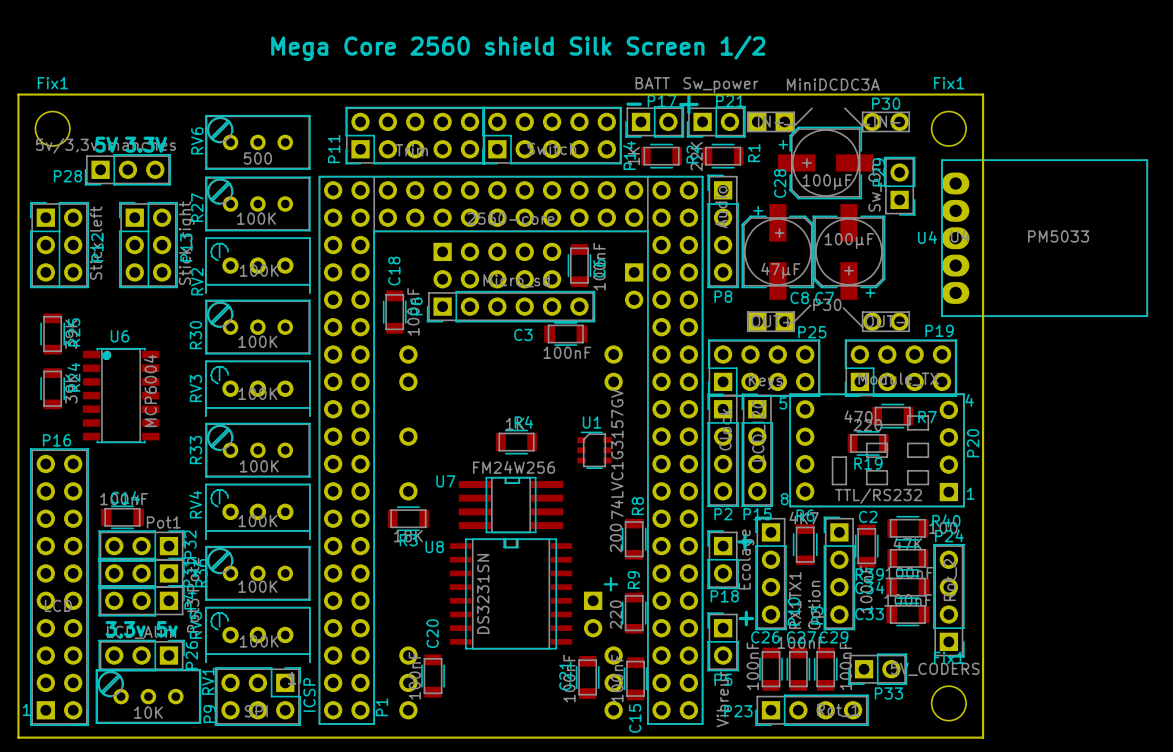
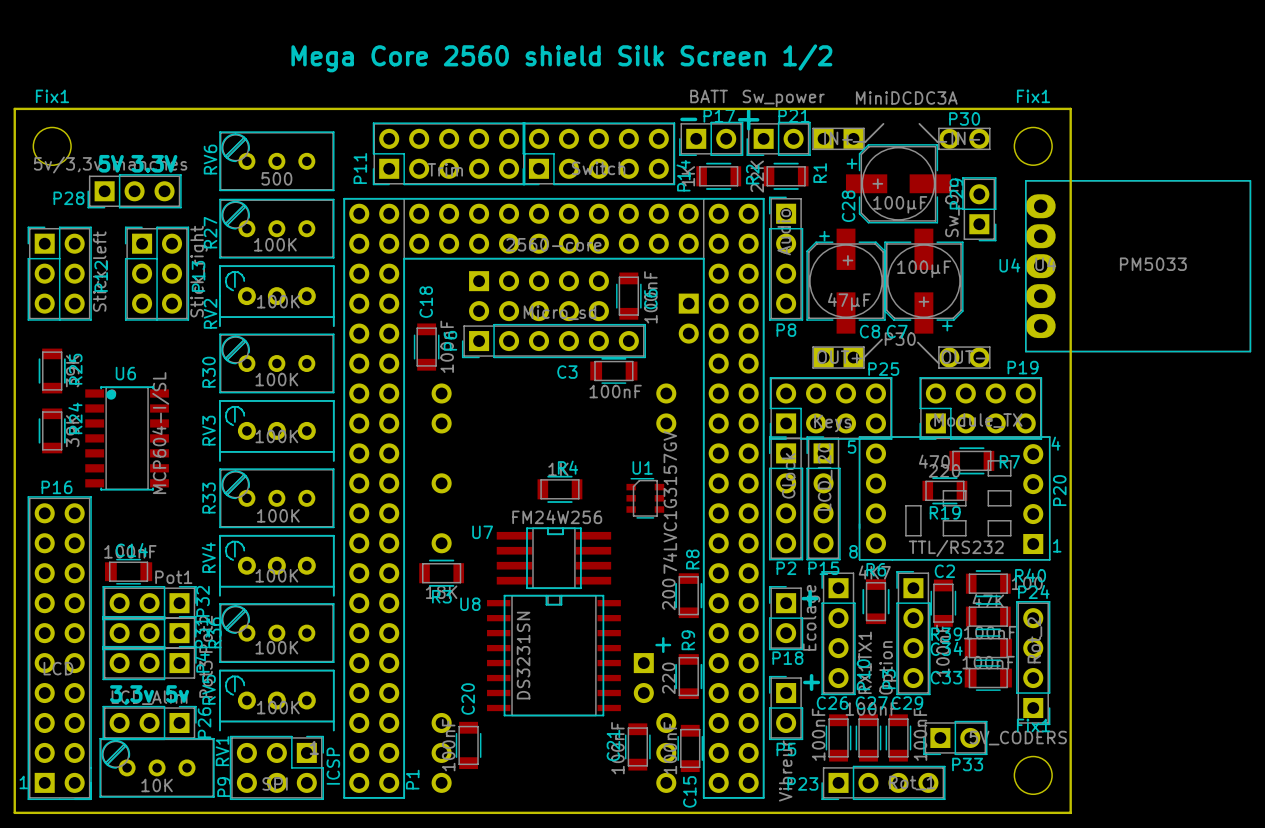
U6 value: MCP6004 (150, 390) -> MCP604-I/SL (160, 433)

